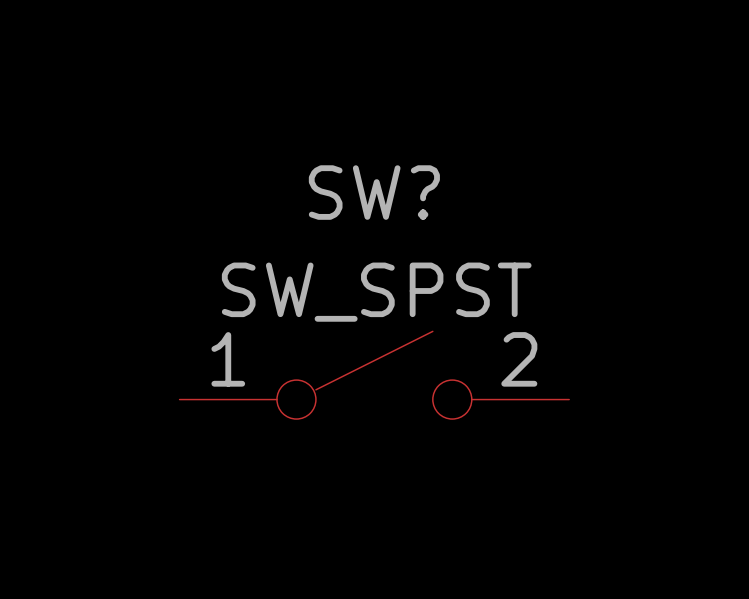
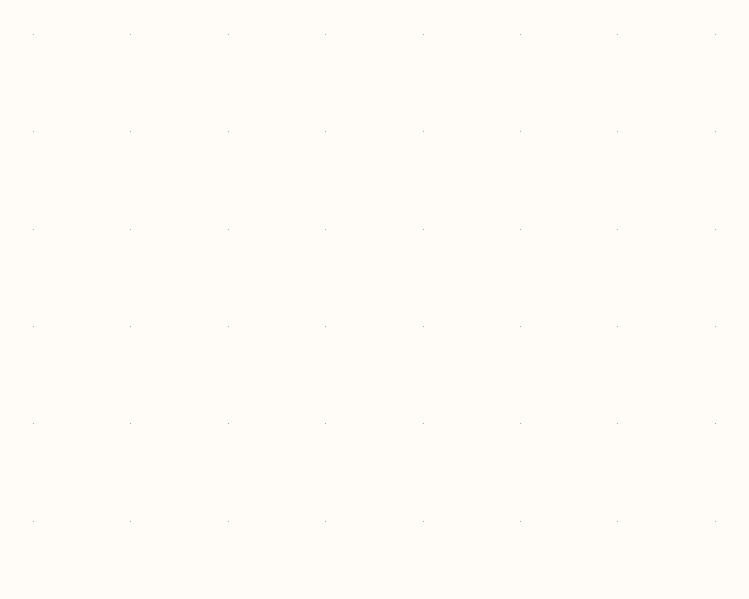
SW?: SW_SPST (374, 375) -> none

